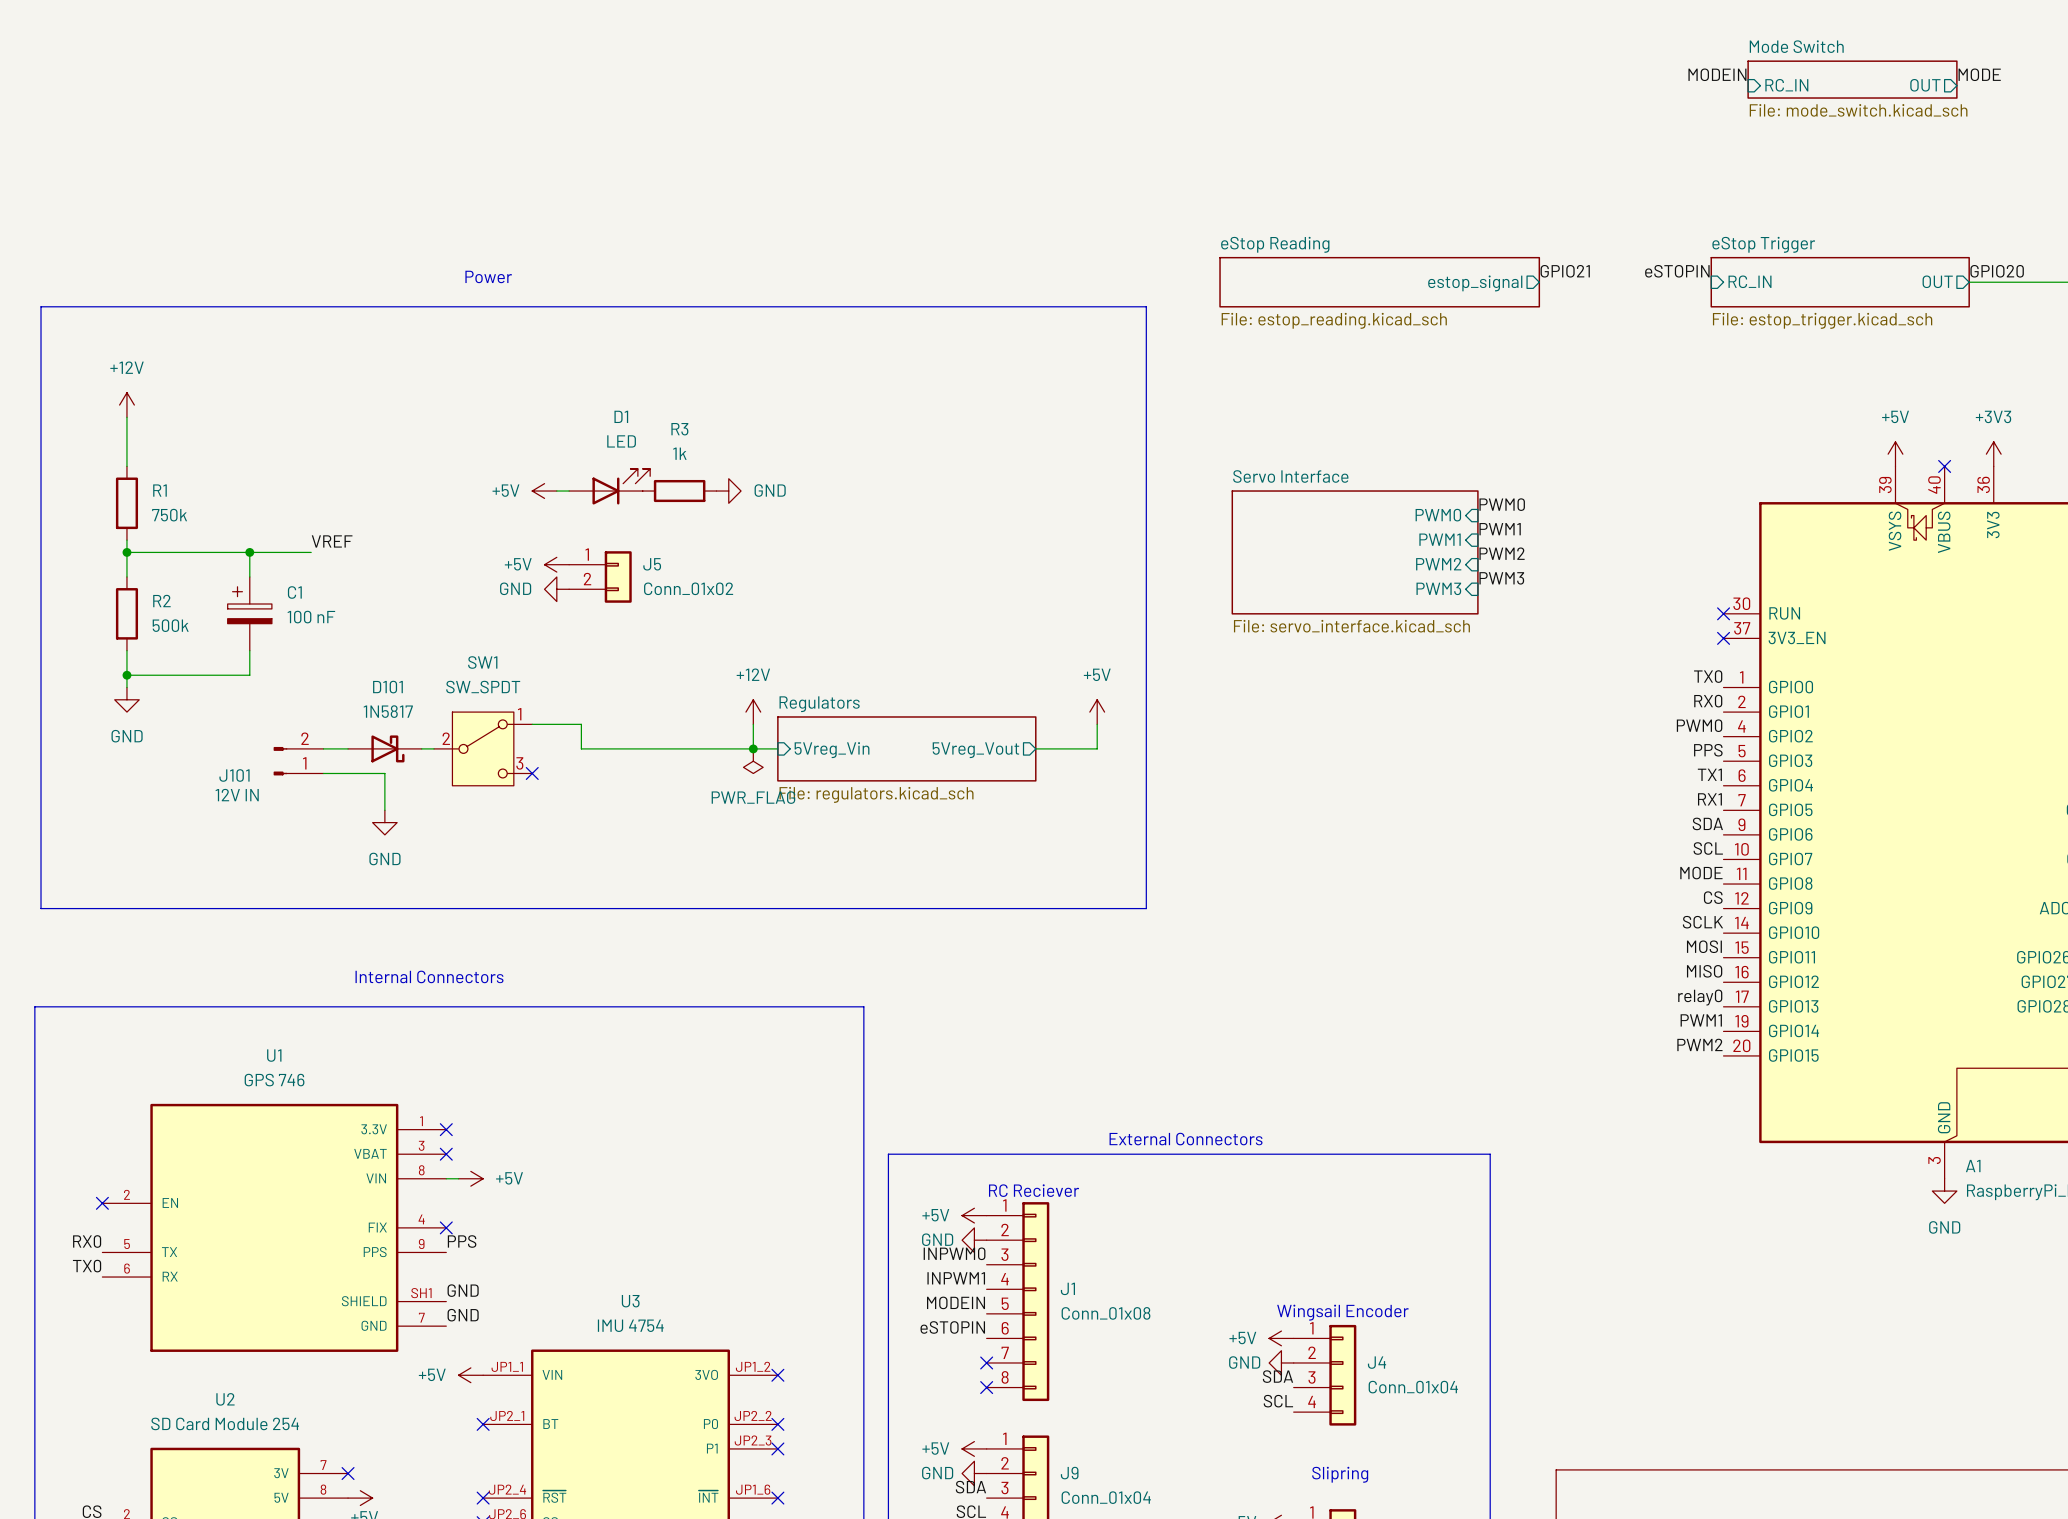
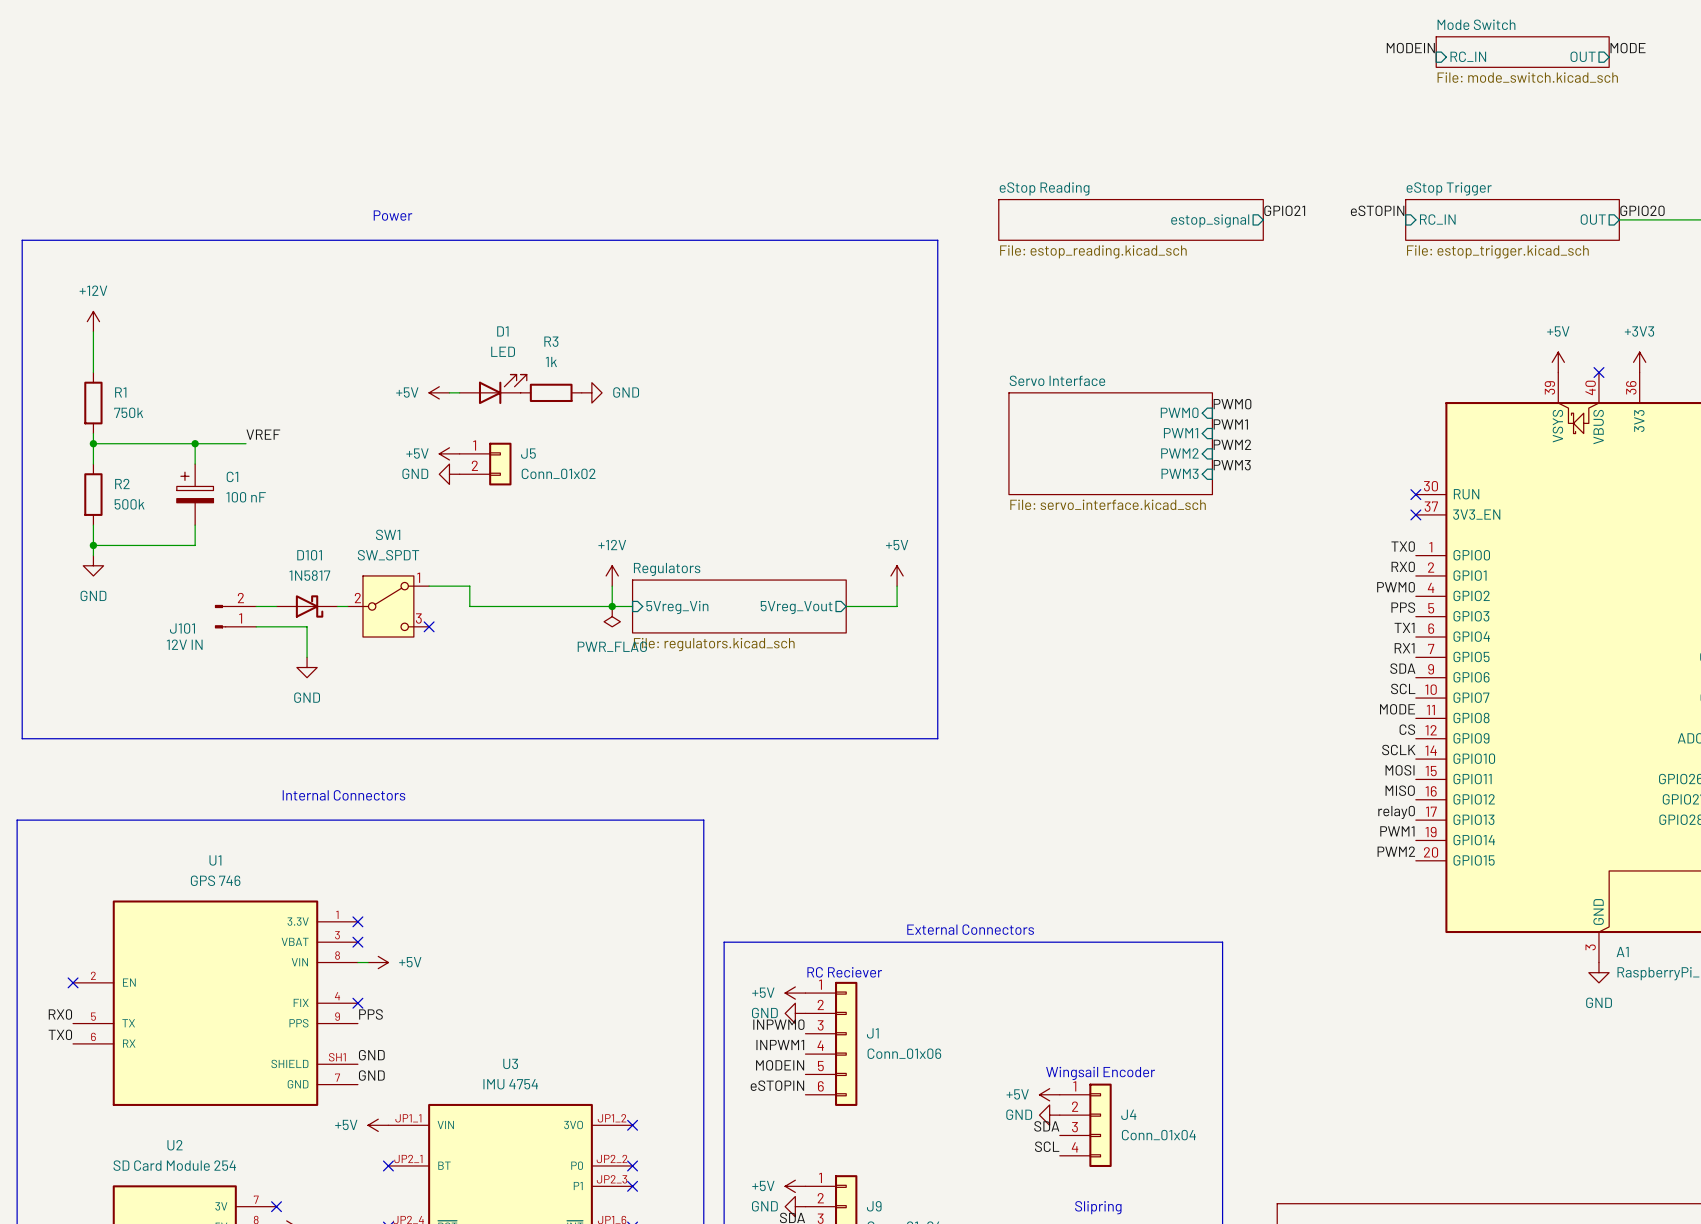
J1 symbol: [986, 1202, 1050, 1402] -> [805, 981, 858, 1106]
J1 value: Conn_01x08 (1106, 1313) -> Conn_01x06 (904, 1053)
no-connect mark: (986, 1362) -> none
no-connect mark: (986, 1387) -> none

